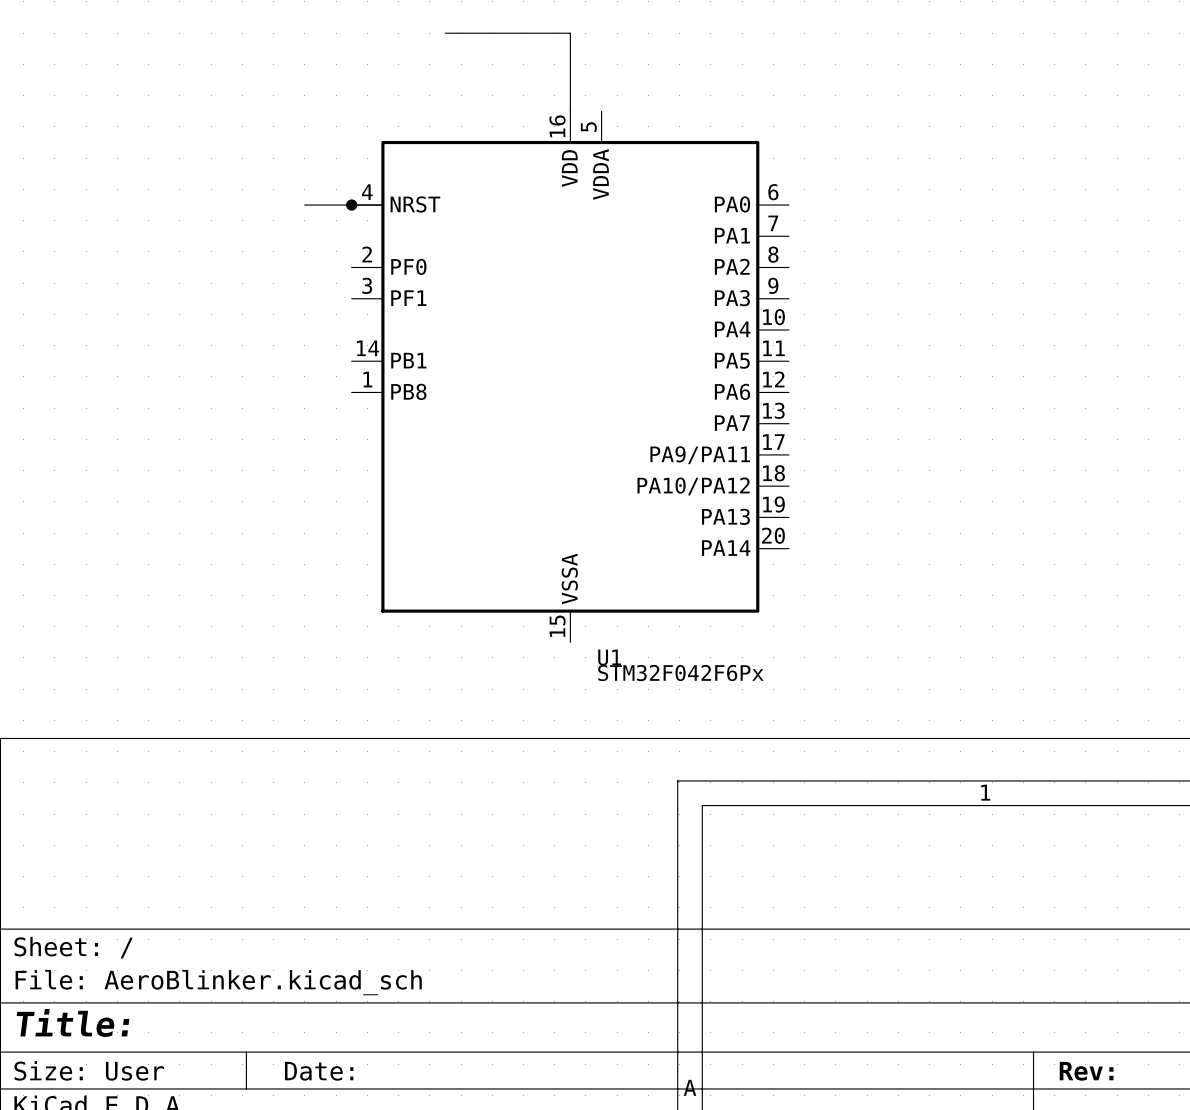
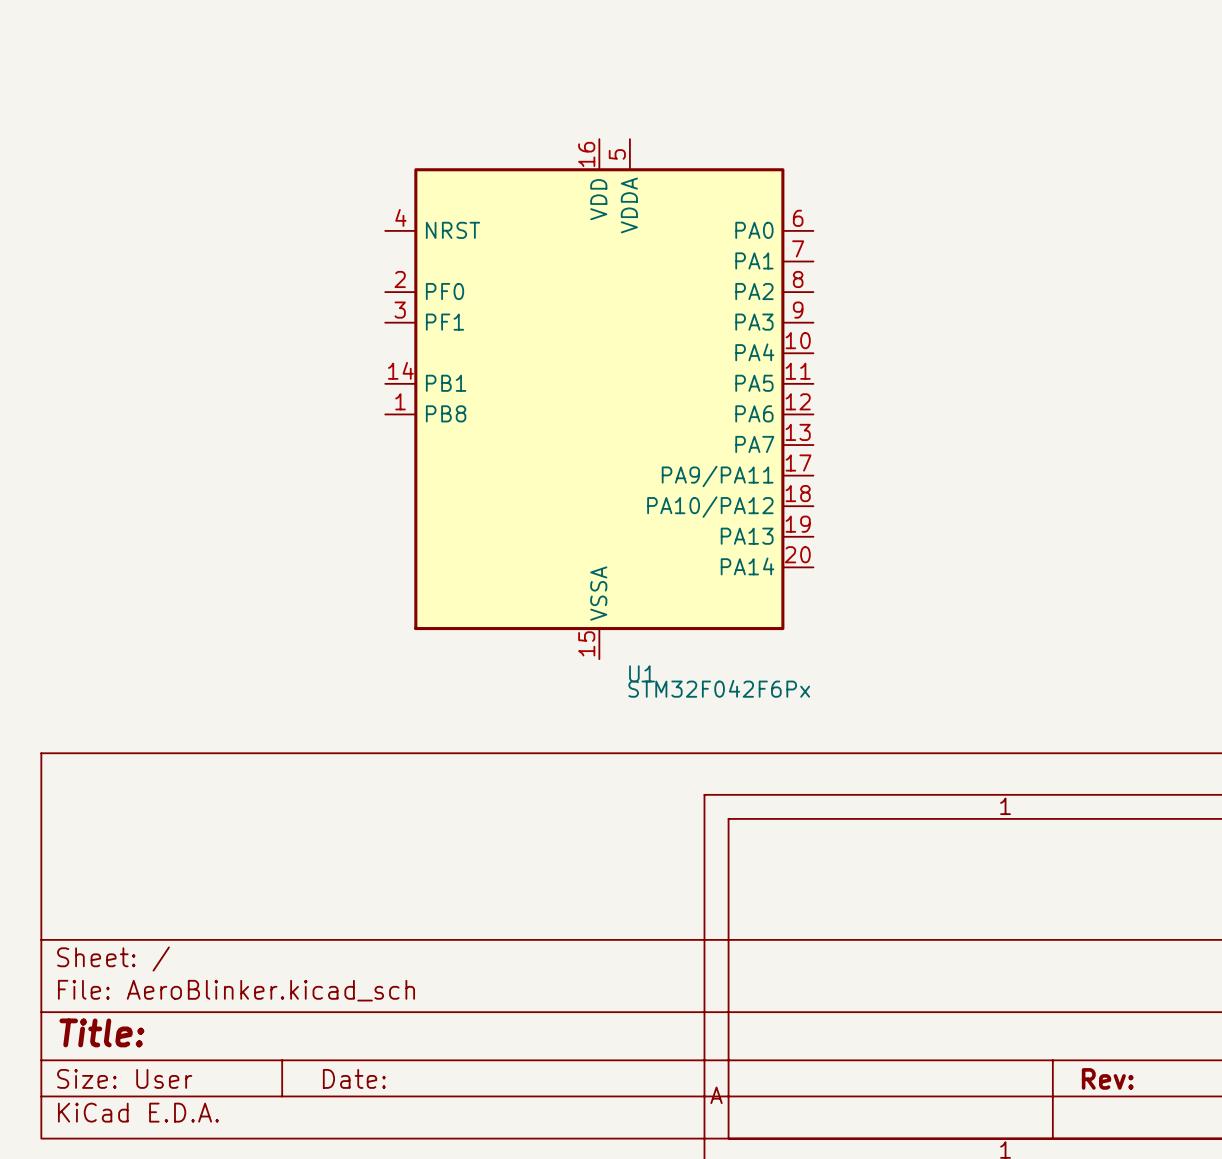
wire: (445, 33) (570, 33) (570, 111) -> none
wire: (304, 205) (382, 205) -> none
junction: (351, 205) -> none

